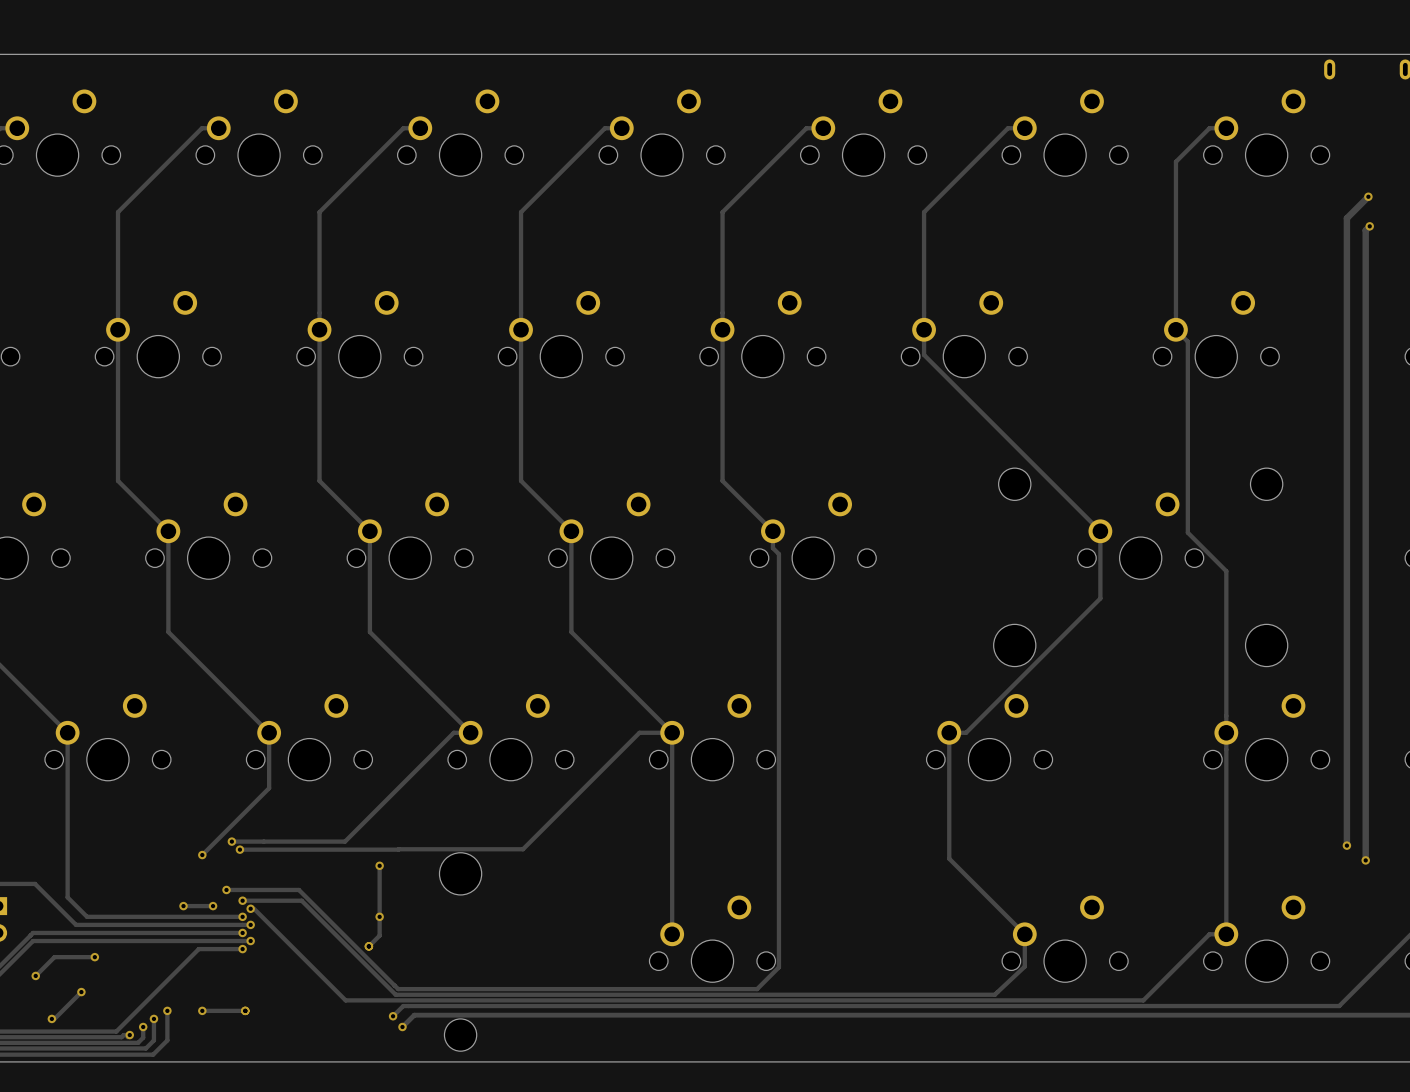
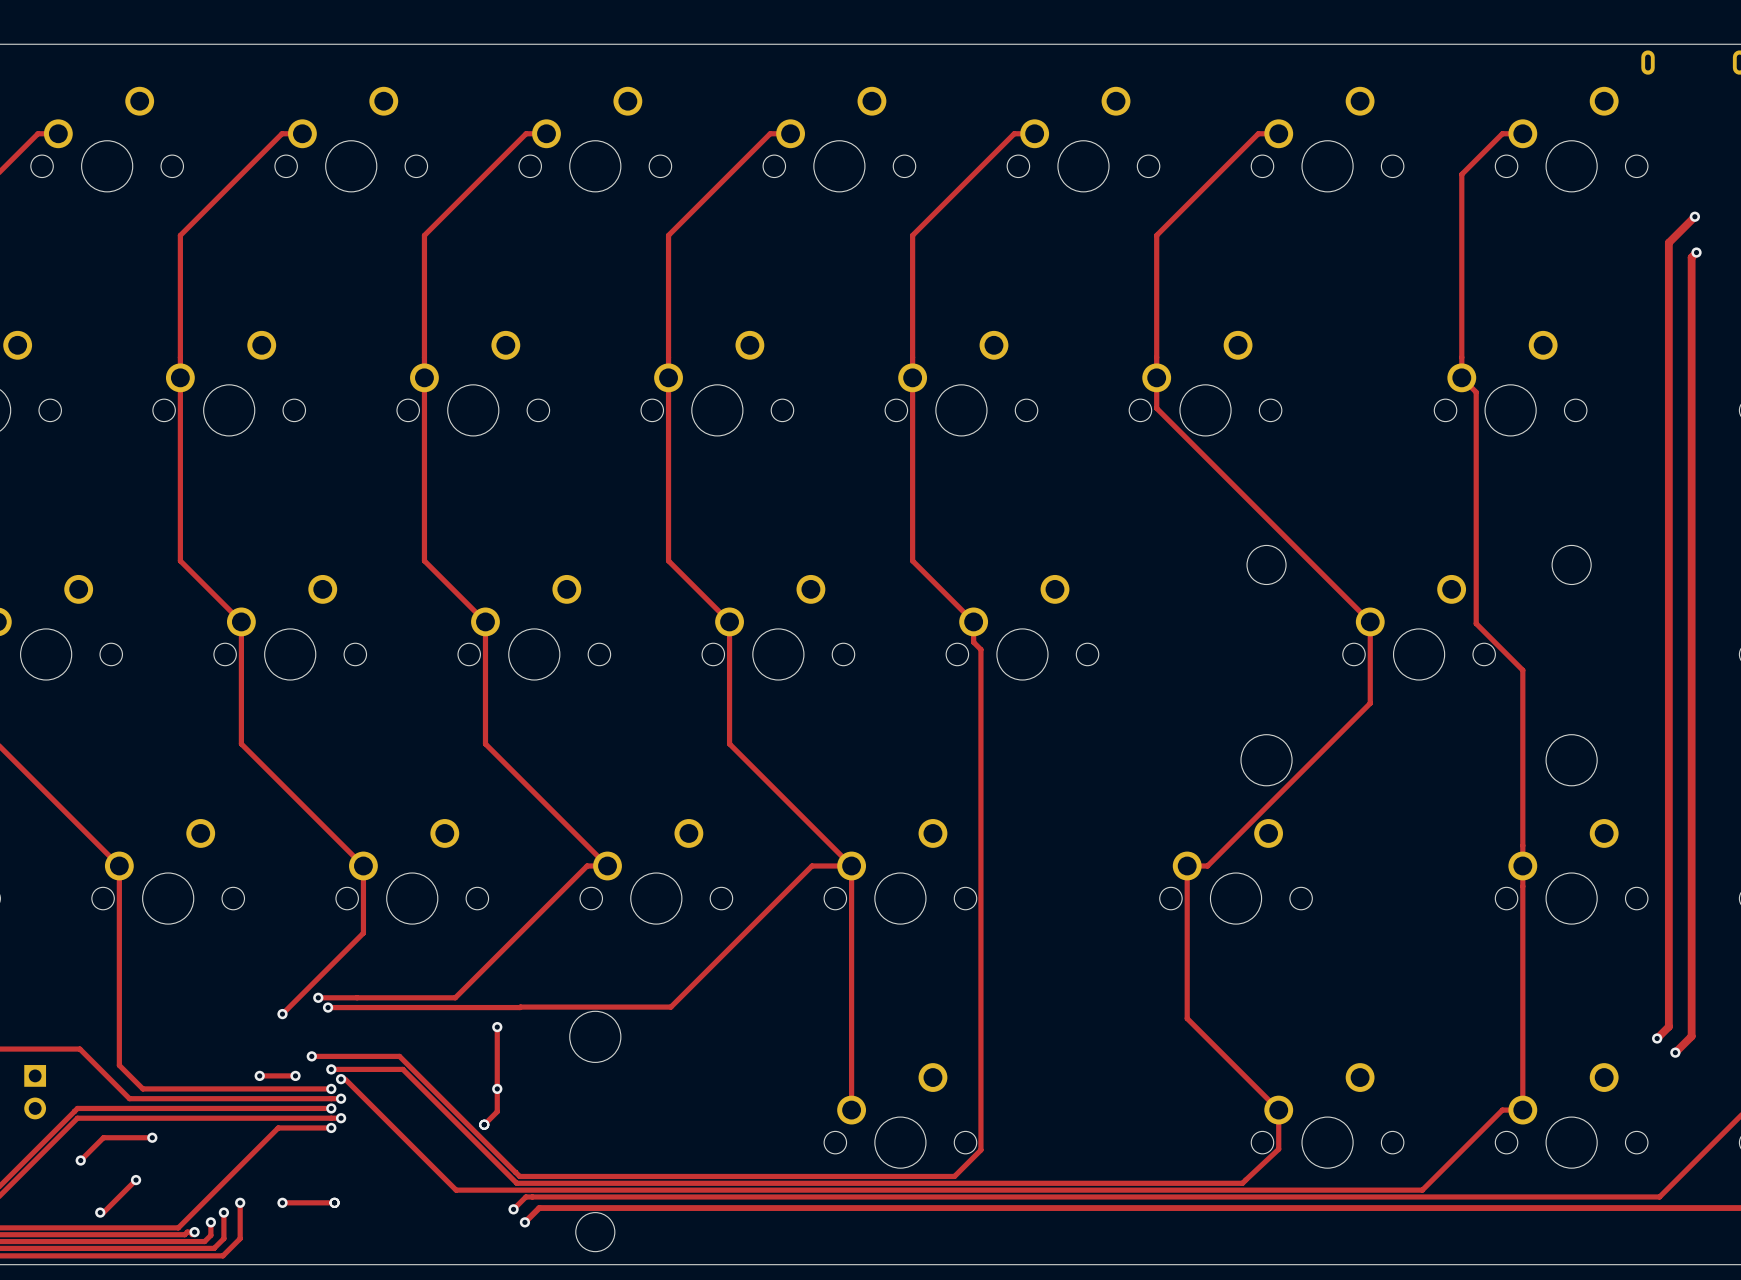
track: none -> (1668, 1002) (1668, 1026) (1657, 1038)
via: (1346, 845) -> none
track: none -> (1691, 1020) (1691, 1036) (1675, 1052)
via: (1365, 860) -> none
via: none -> (1657, 1038)
via: none -> (1675, 1052)

